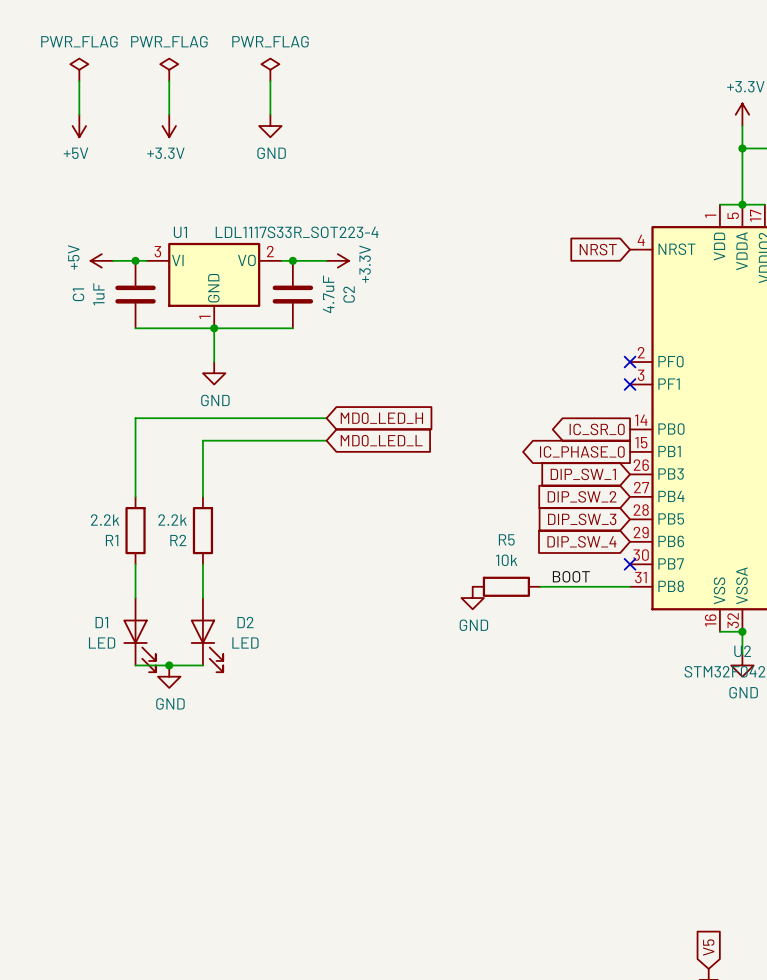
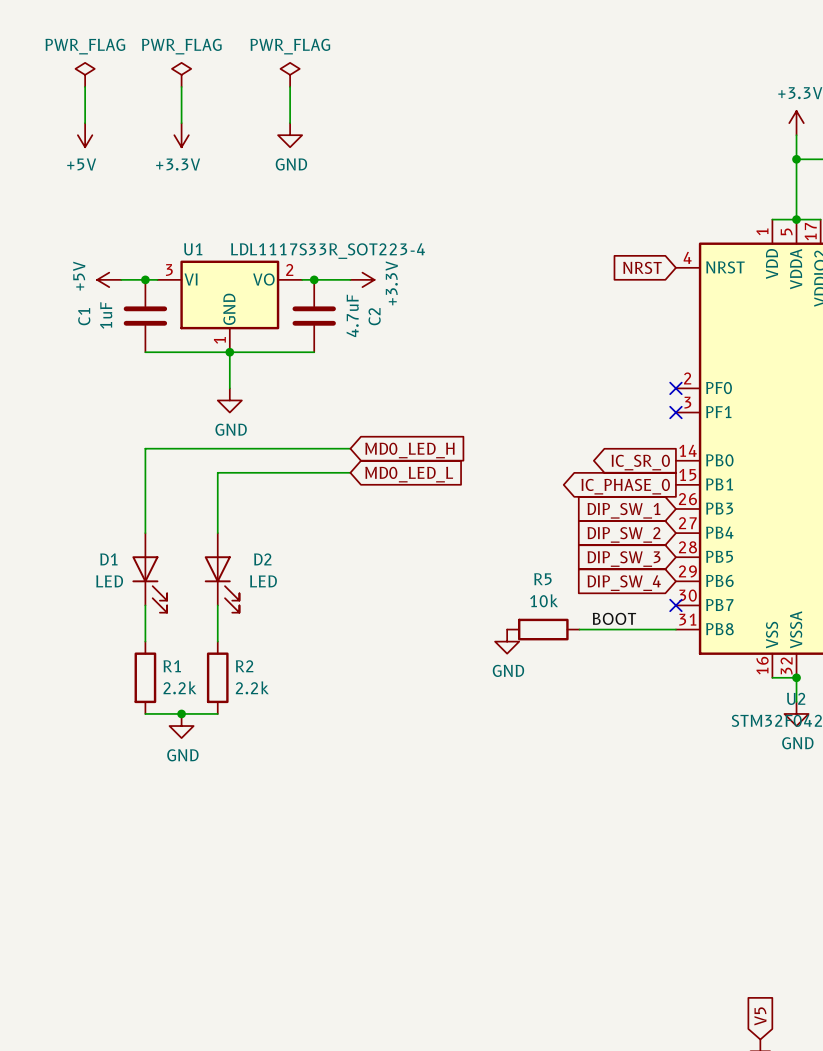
R1 value position: 2.2k (105, 520) -> 2.2k (179, 687)
R2 value position: 2.2k (172, 520) -> 2.2k (252, 687)
R1 position: (135, 530) -> (145, 677)
R2 position: (202, 530) -> (217, 677)
R1 name position: R1 (112, 540) -> R1 (172, 666)
R2 name position: R2 (178, 540) -> R2 (244, 666)
D1 position: (139, 635) -> (149, 572)
D2 position: (207, 635) -> (222, 572)

